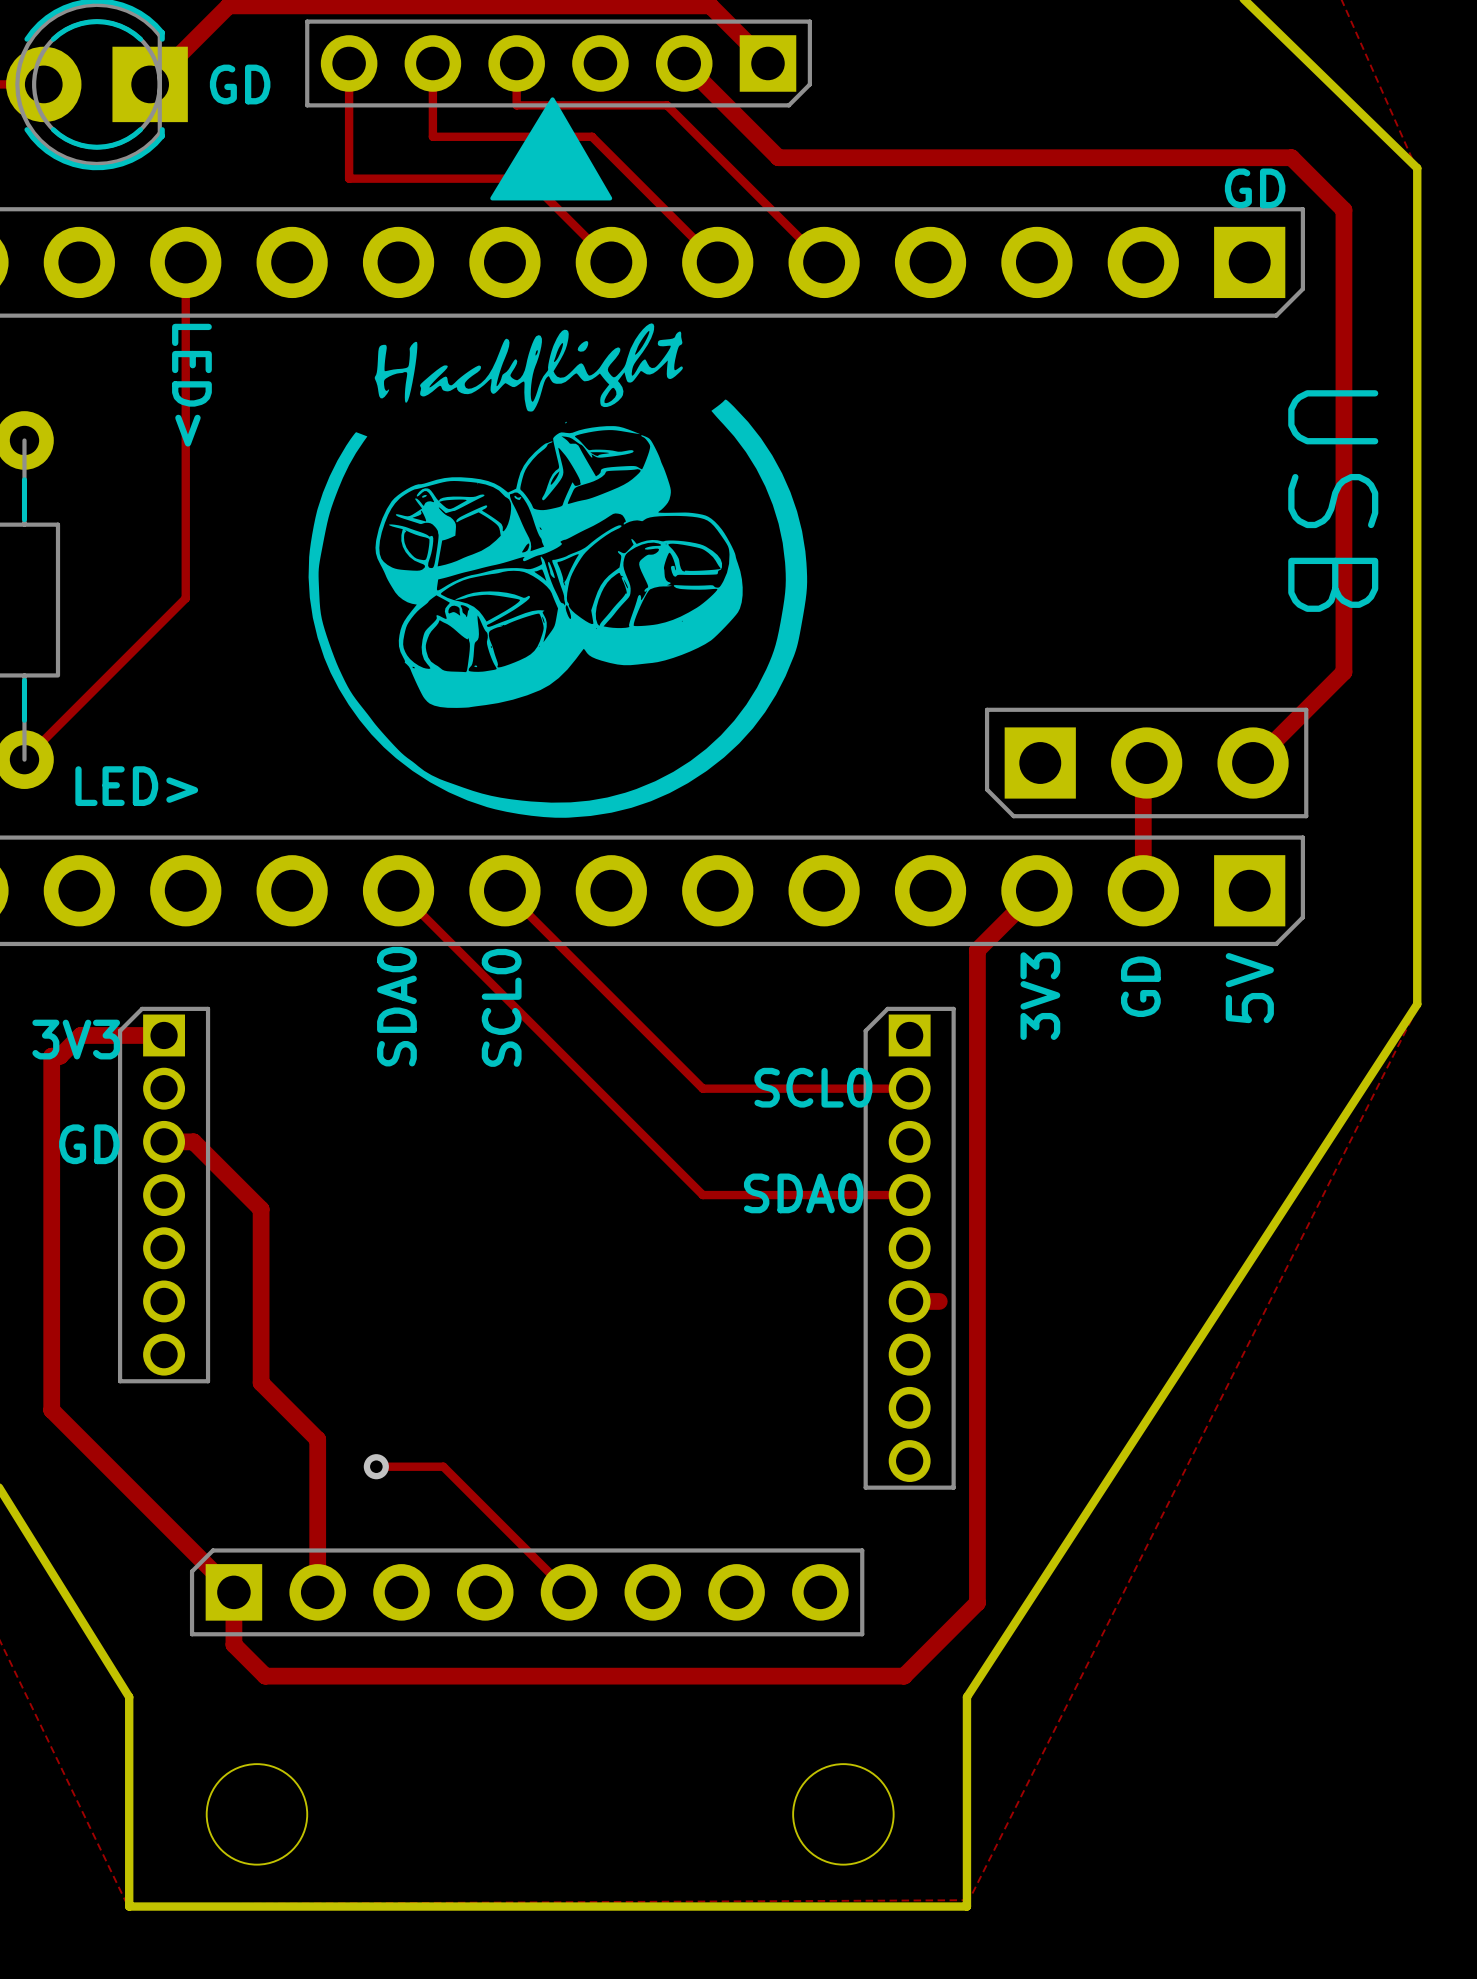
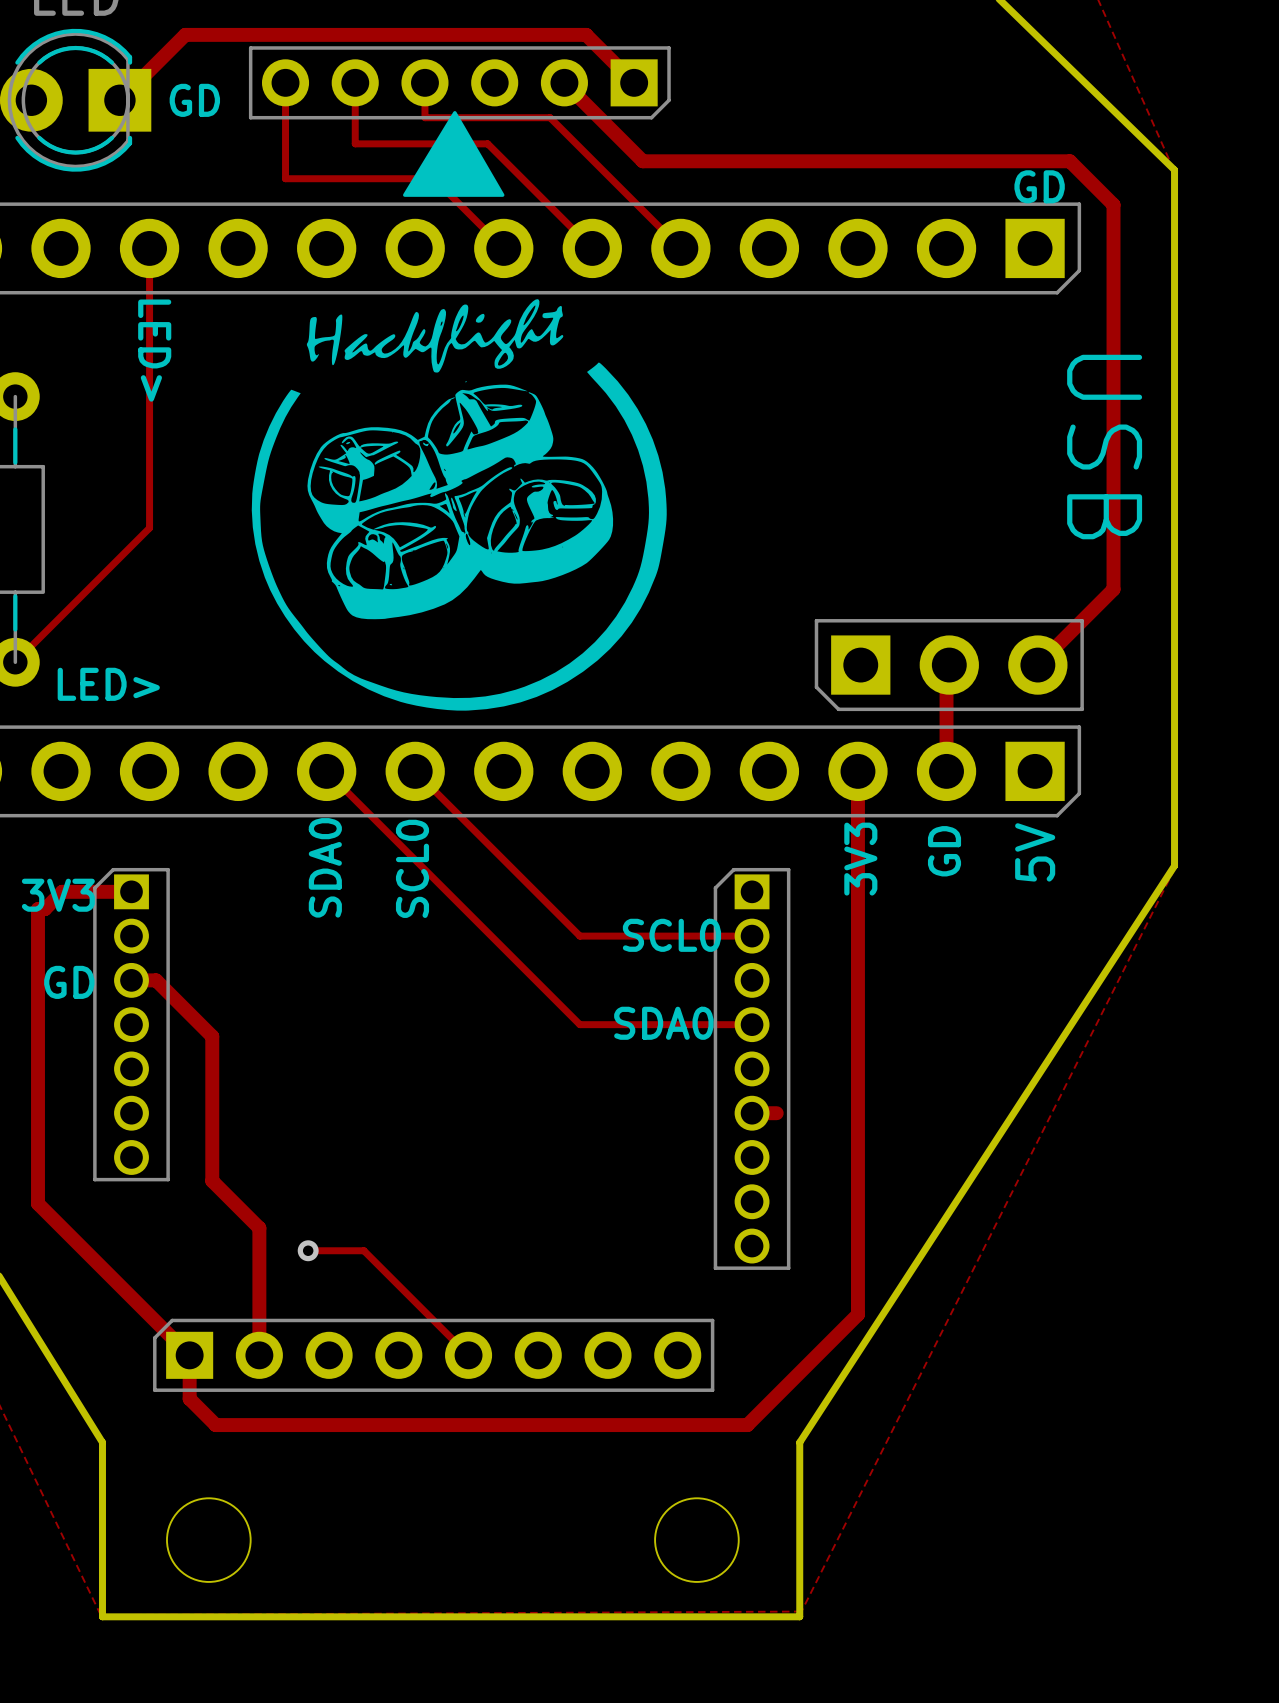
track: (1036, 890) (977, 950) (977, 1602) -> (857, 771) (857, 1314) (808, 1364)

